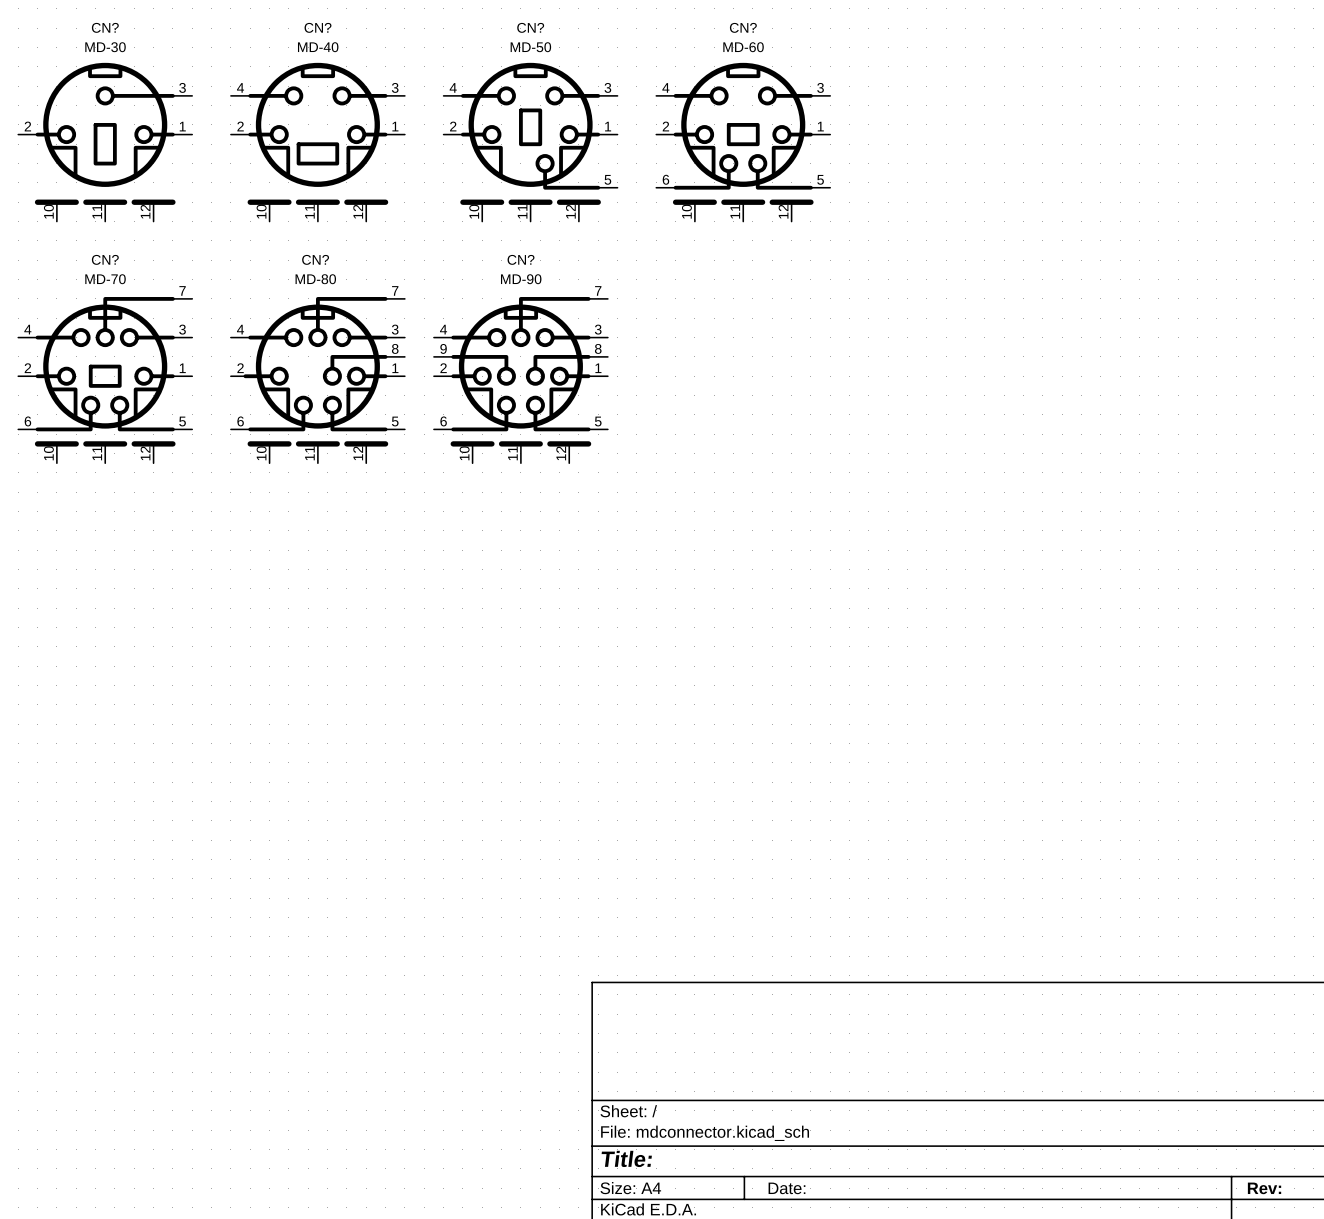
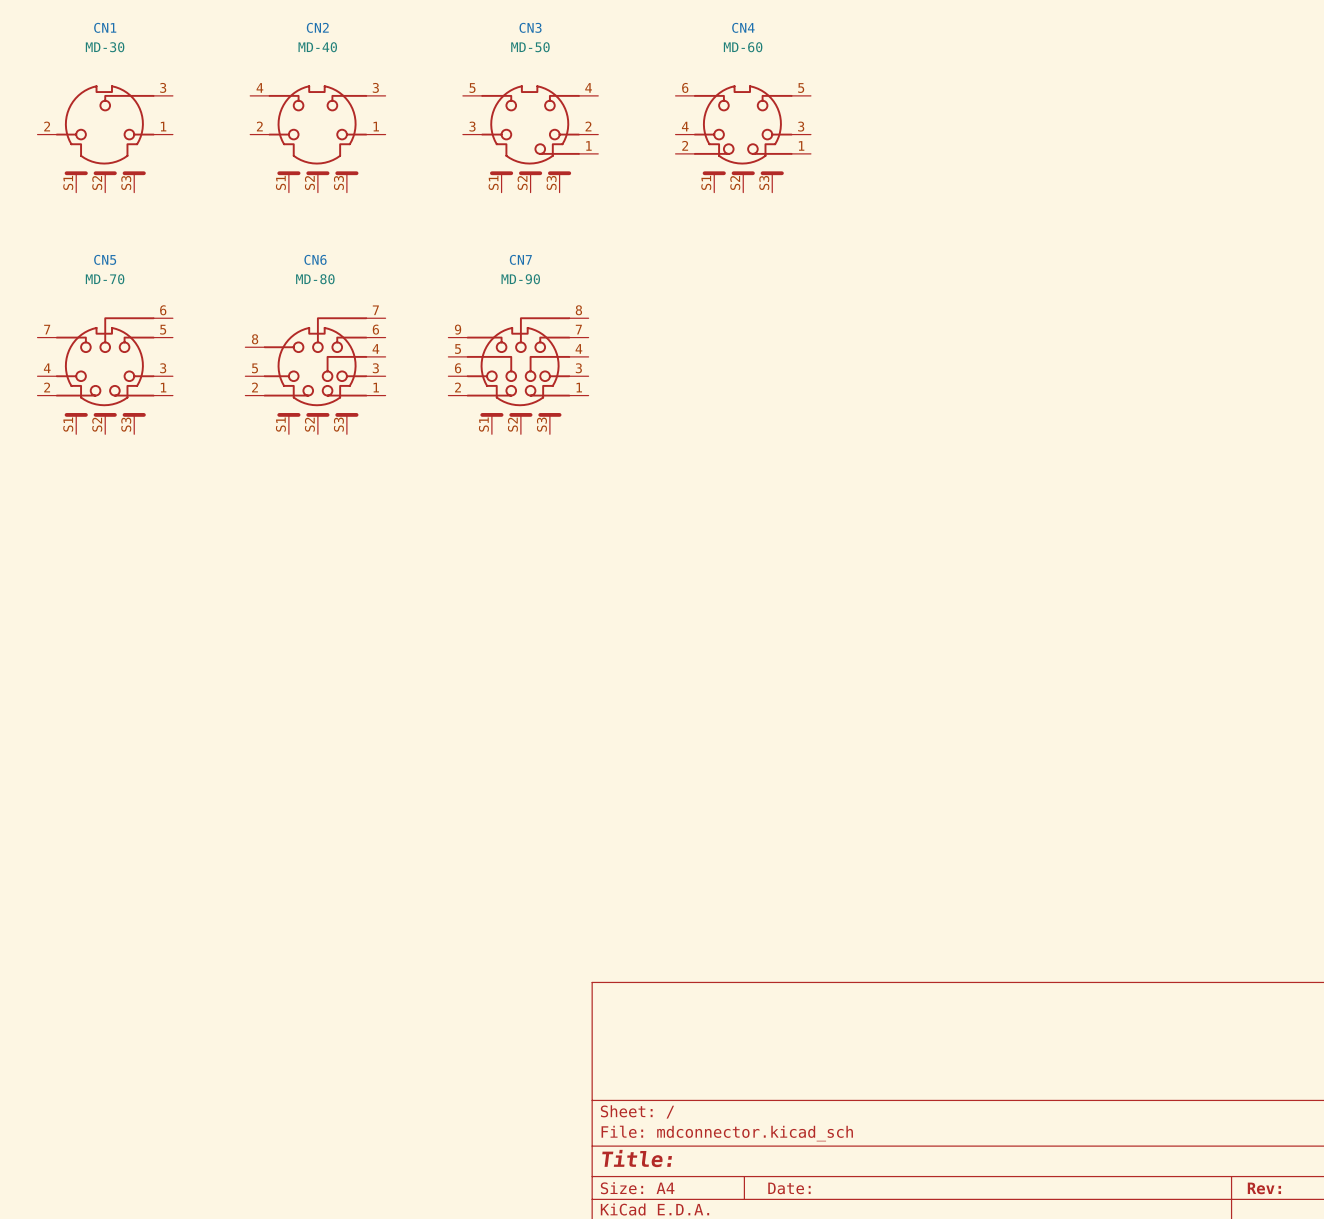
CN1: none -> MD-30 (105, 136)
CN2: none -> MD-40 (317, 138)
CN3: none -> MD-50 (530, 138)
CN4: none -> MD-60 (743, 138)
CN?: MD-30 (105, 142) -> none
CN?: MD-40 (317, 142) -> none
CN?: MD-50 (530, 142) -> none
CN?: MD-60 (743, 142) -> none
CN5: none -> MD-70 (105, 375)
CN6: none -> MD-80 (315, 375)
CN7: none -> MD-90 (518, 375)
CN?: MD-70 (105, 380) -> none
CN?: MD-80 (317, 380) -> none
CN?: MD-90 (520, 380) -> none

